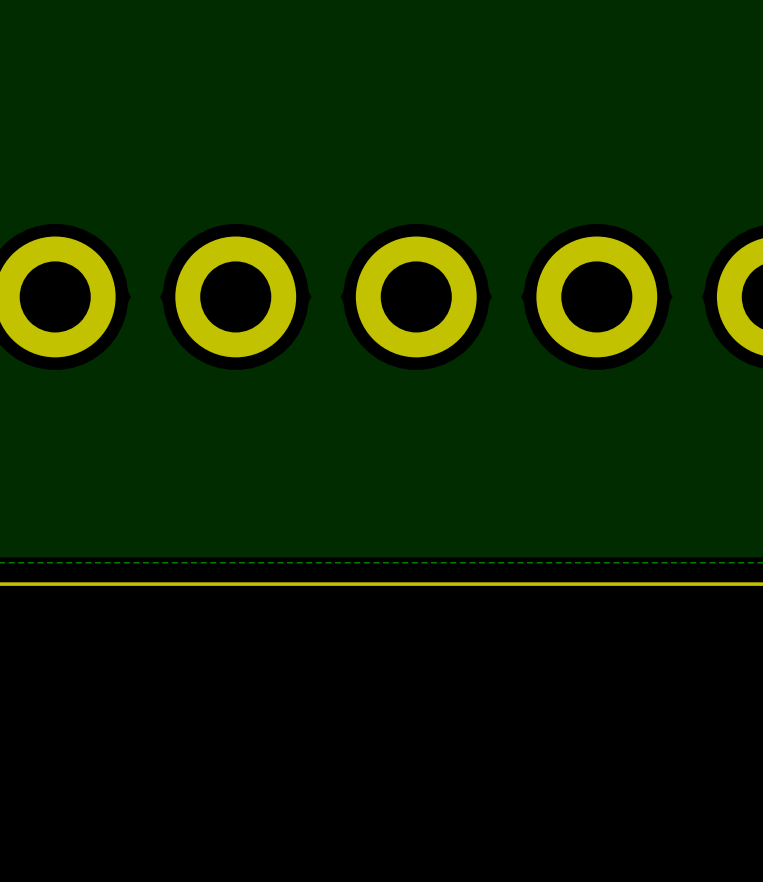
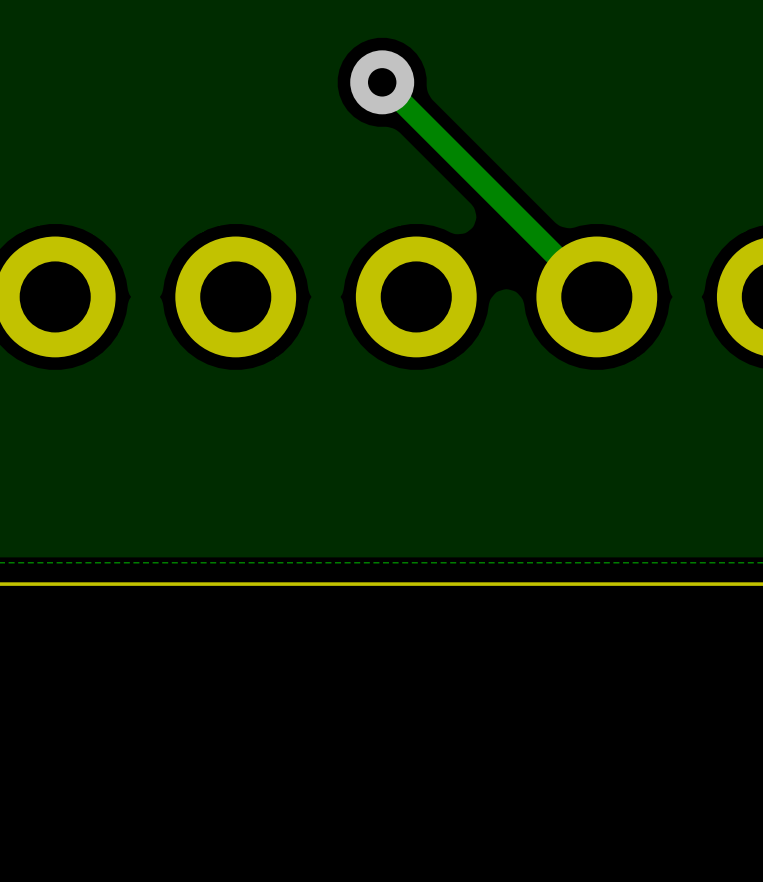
track: none -> (382, 82) (596, 296)
via: none -> (382, 82)

